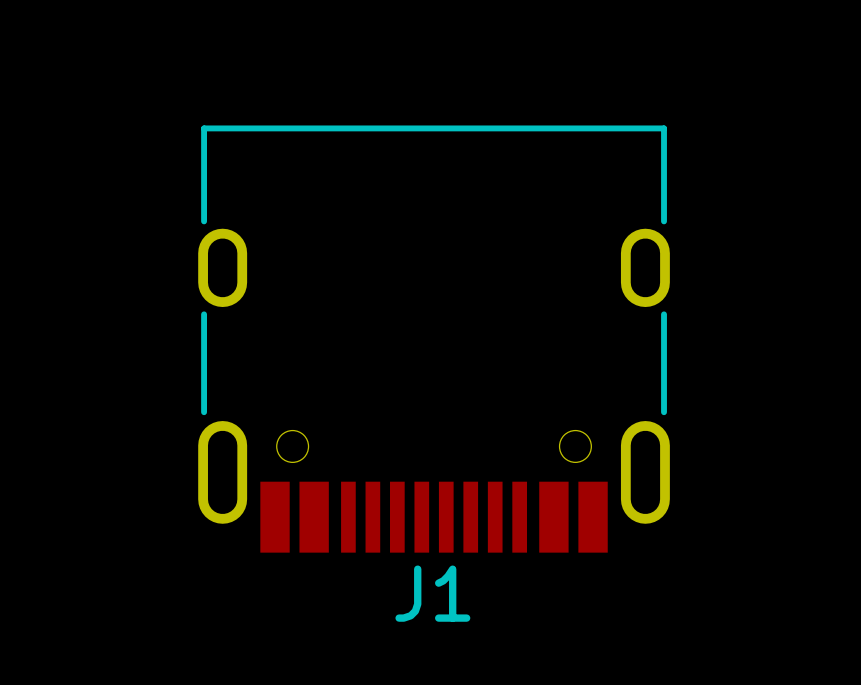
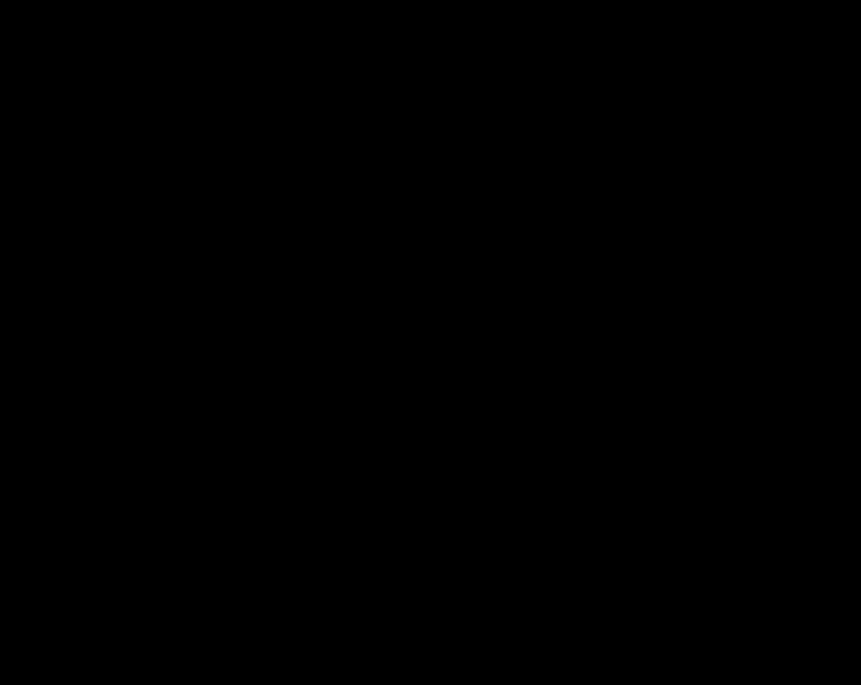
J1: (434, 339) -> none

